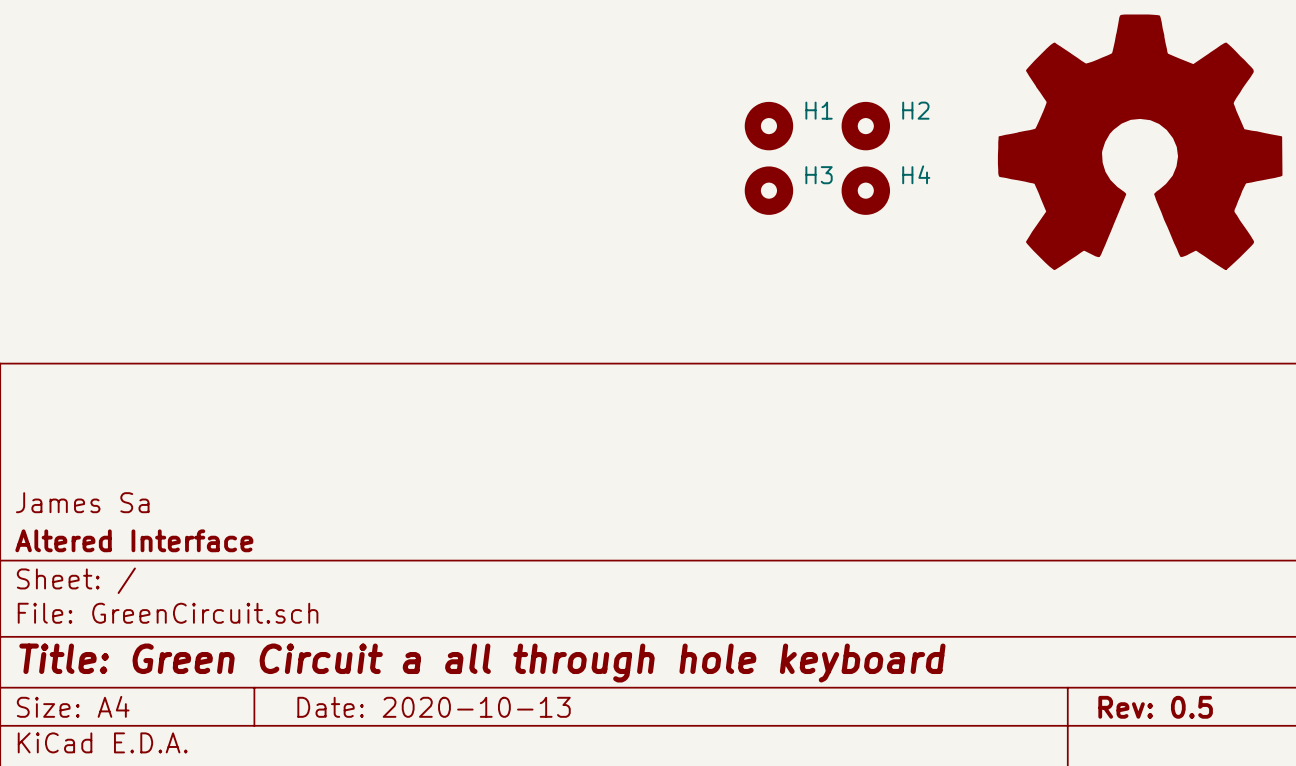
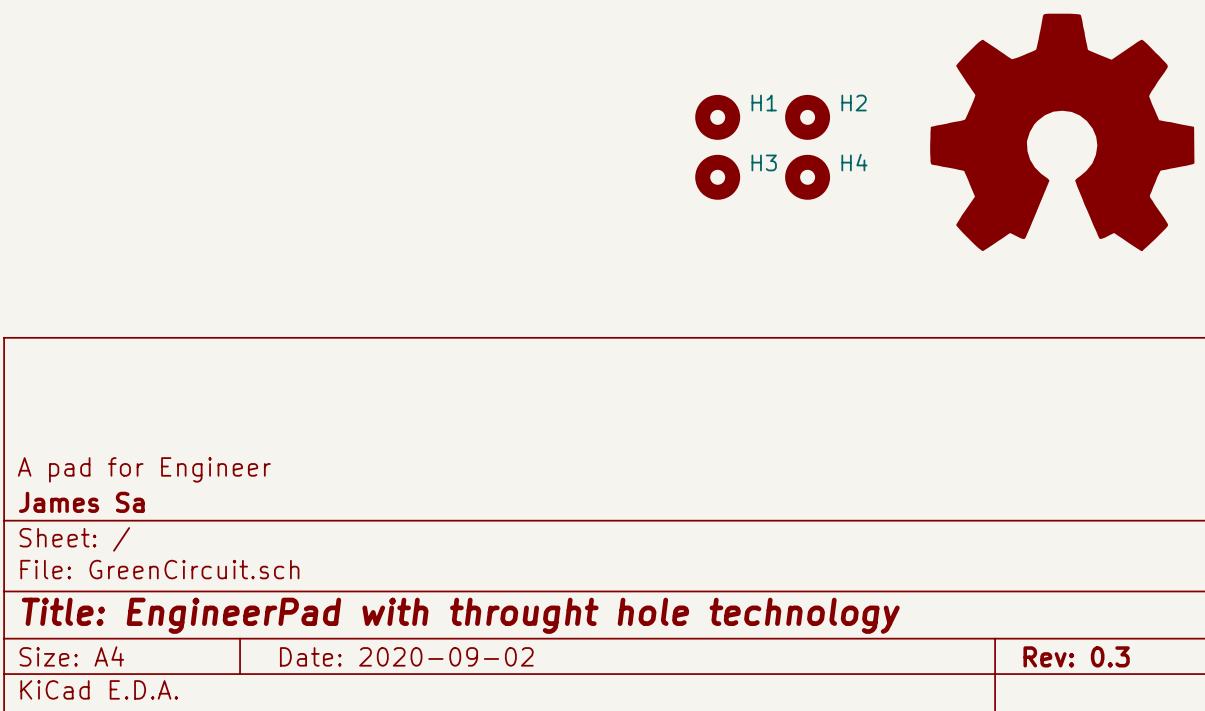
title block: James Sa (82, 502) -> A pad for Engineer (144, 469)
title block: Altered Interface (134, 540) -> James Sa (81, 502)
title block: Title: Green Circuit a all through hole keyboard (482, 663) -> Title: EngineerPad with throught hole technology (460, 615)
title block: Date: 2020-10-13 (434, 707) -> Date: 2020-09-02 (406, 656)
title block: Rev: 0.5 (1155, 707) -> Rev: 0.3 (1076, 656)

